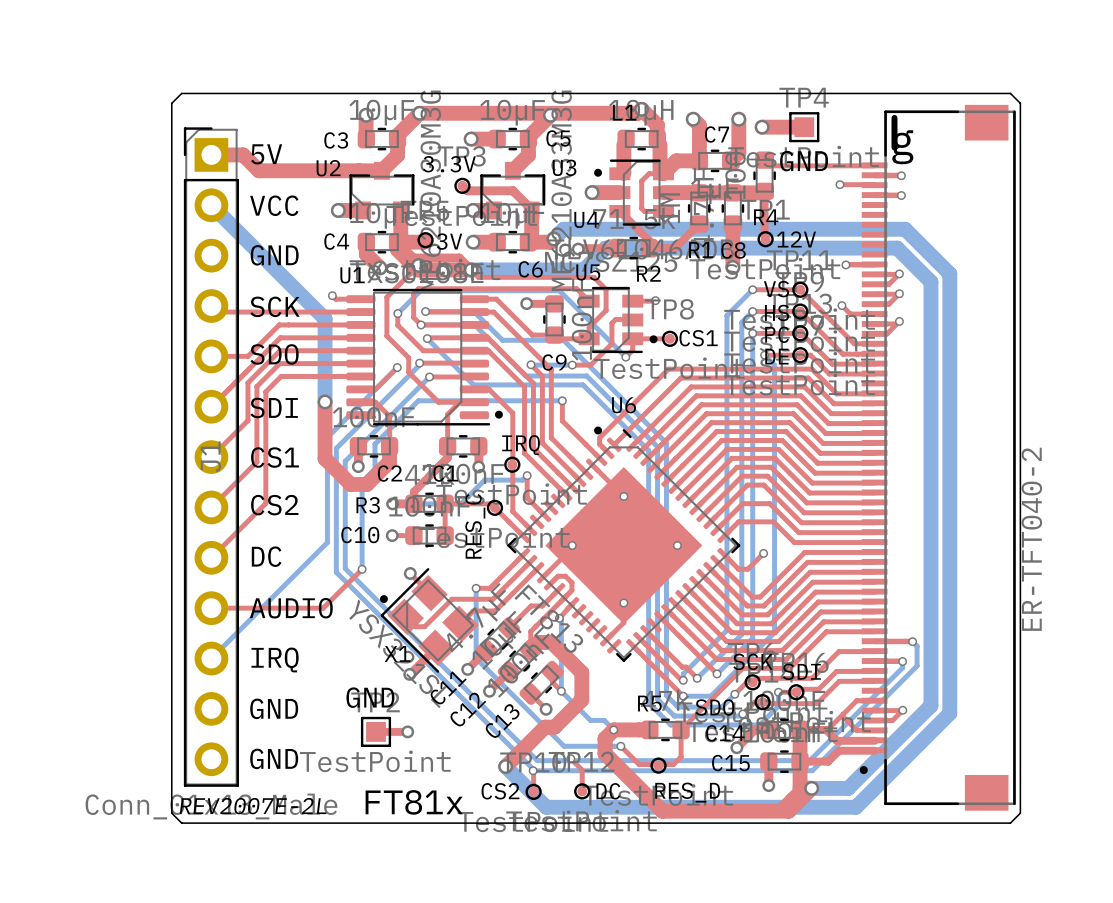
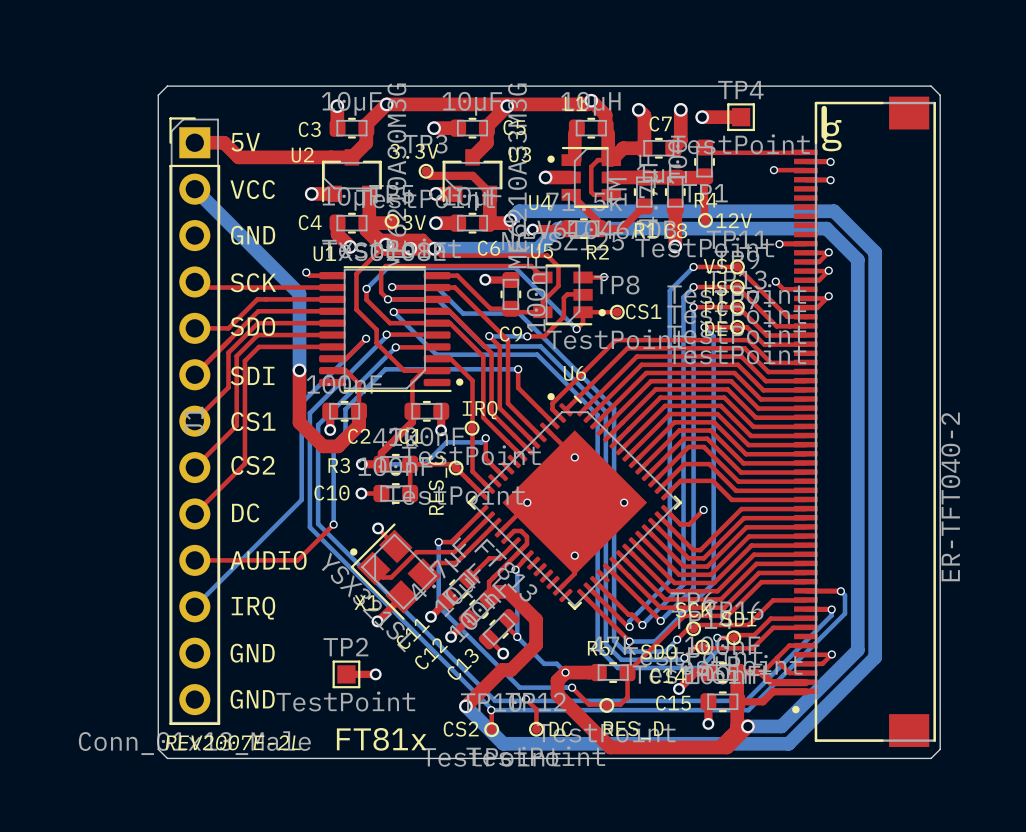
text: GND (804, 161) -> none
text: GND (370, 697) -> none

